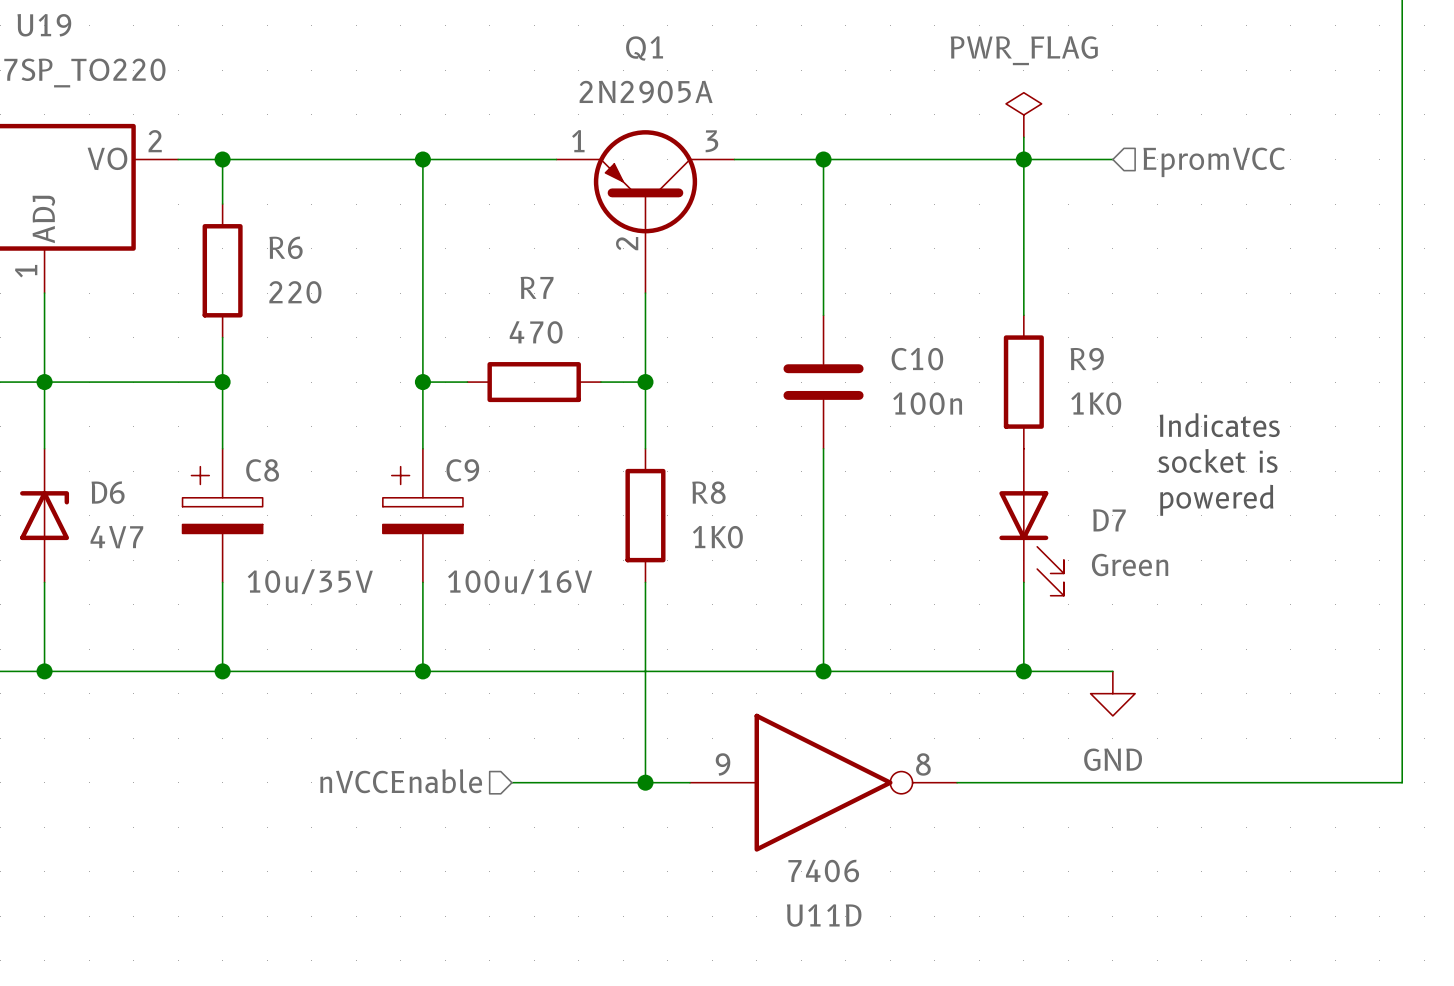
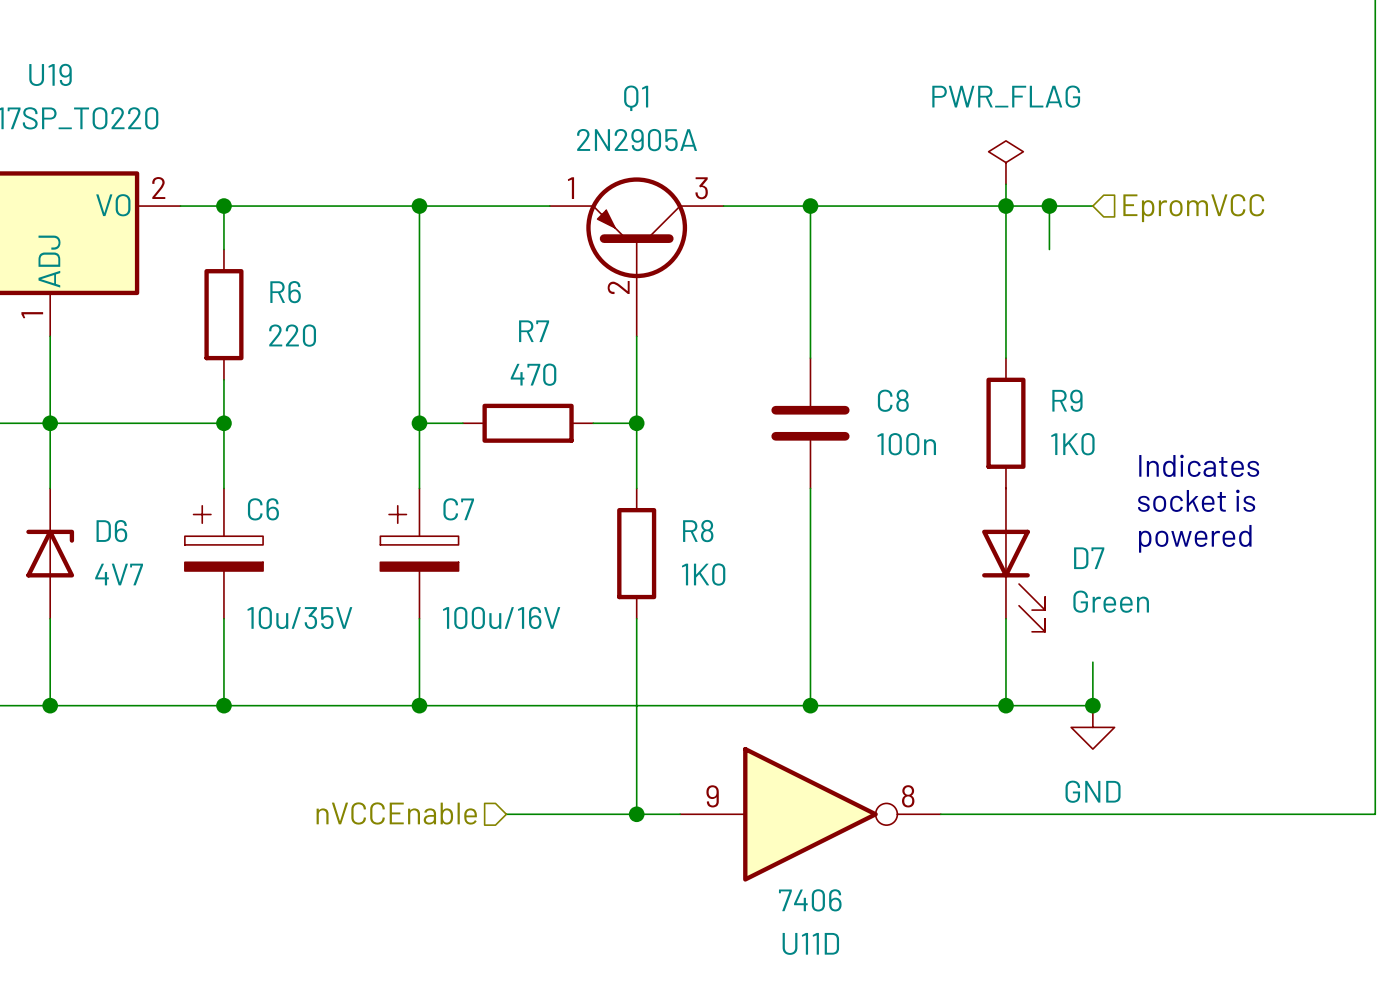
wire: none -> (1049, 206) (1049, 249)
junction: none -> (1049, 206)
C10 name: C10 (917, 359) -> C8 (893, 400)
C8 name: C8 (262, 470) -> C6 (263, 509)
C9 name: C9 (462, 470) -> C7 (458, 509)
wire: none -> (1092, 662) (1092, 705)
junction: none -> (1092, 705)

